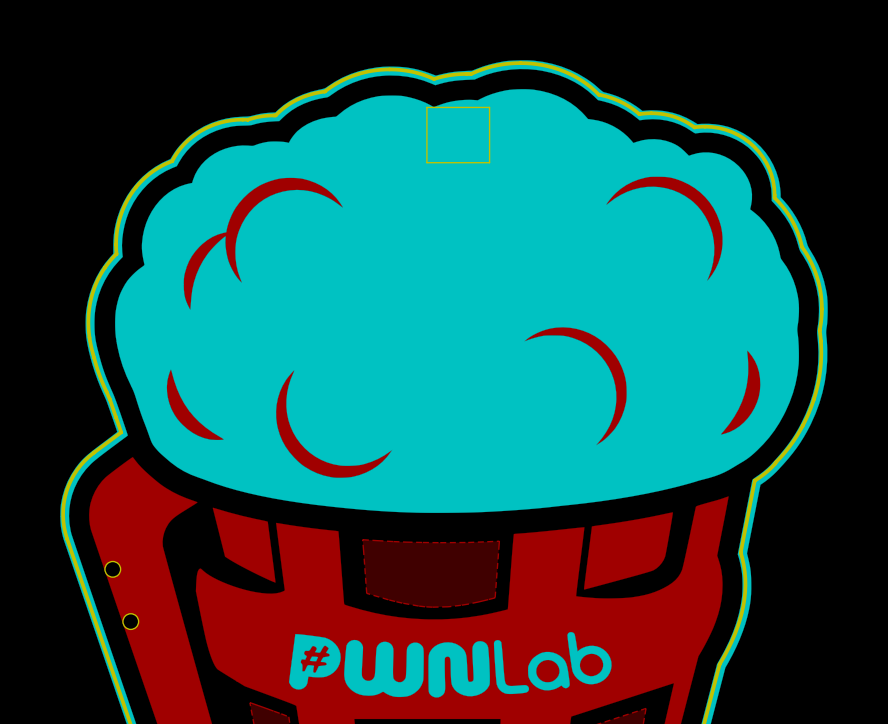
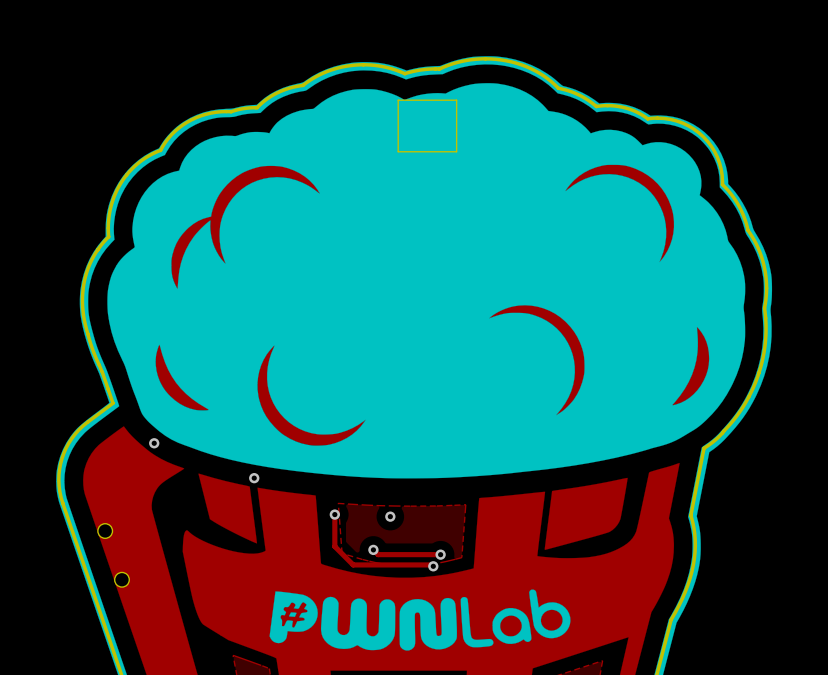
via: none -> (154, 443)
via: none -> (254, 478)
track: none -> (334, 514) (334, 546) (353, 564) (433, 566)
via: none -> (334, 514)
via: none -> (390, 516)
track: none -> (373, 549) (378, 554) (440, 554)
via: none -> (373, 549)
via: none -> (440, 554)
via: none -> (433, 566)

